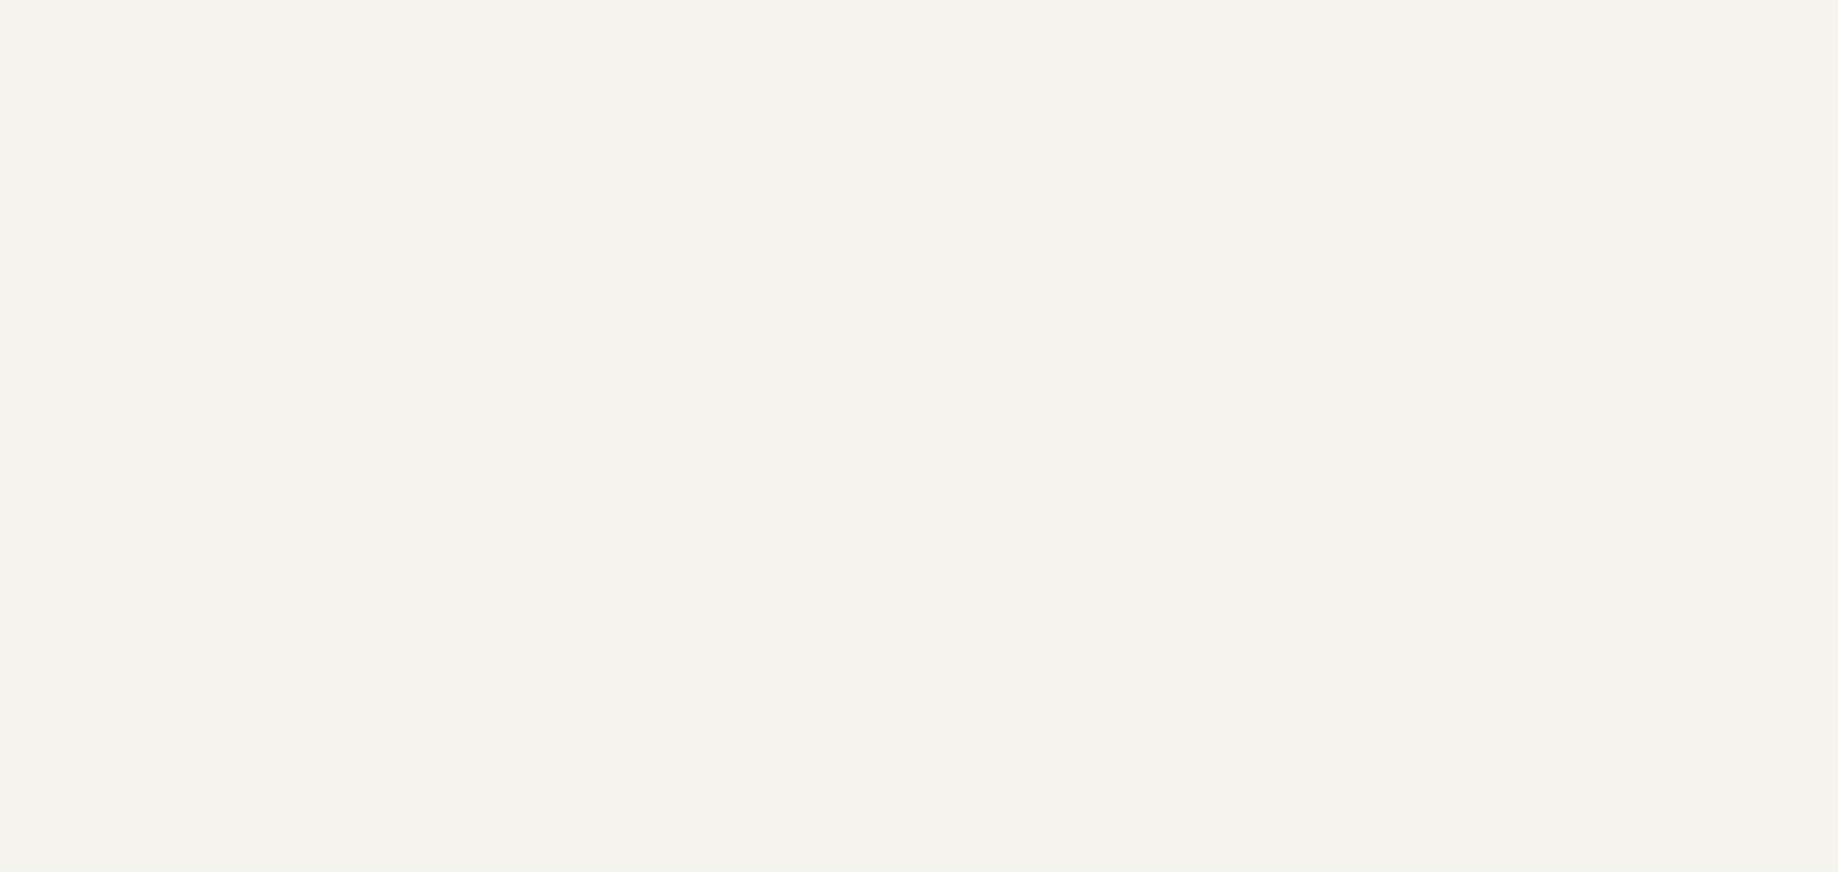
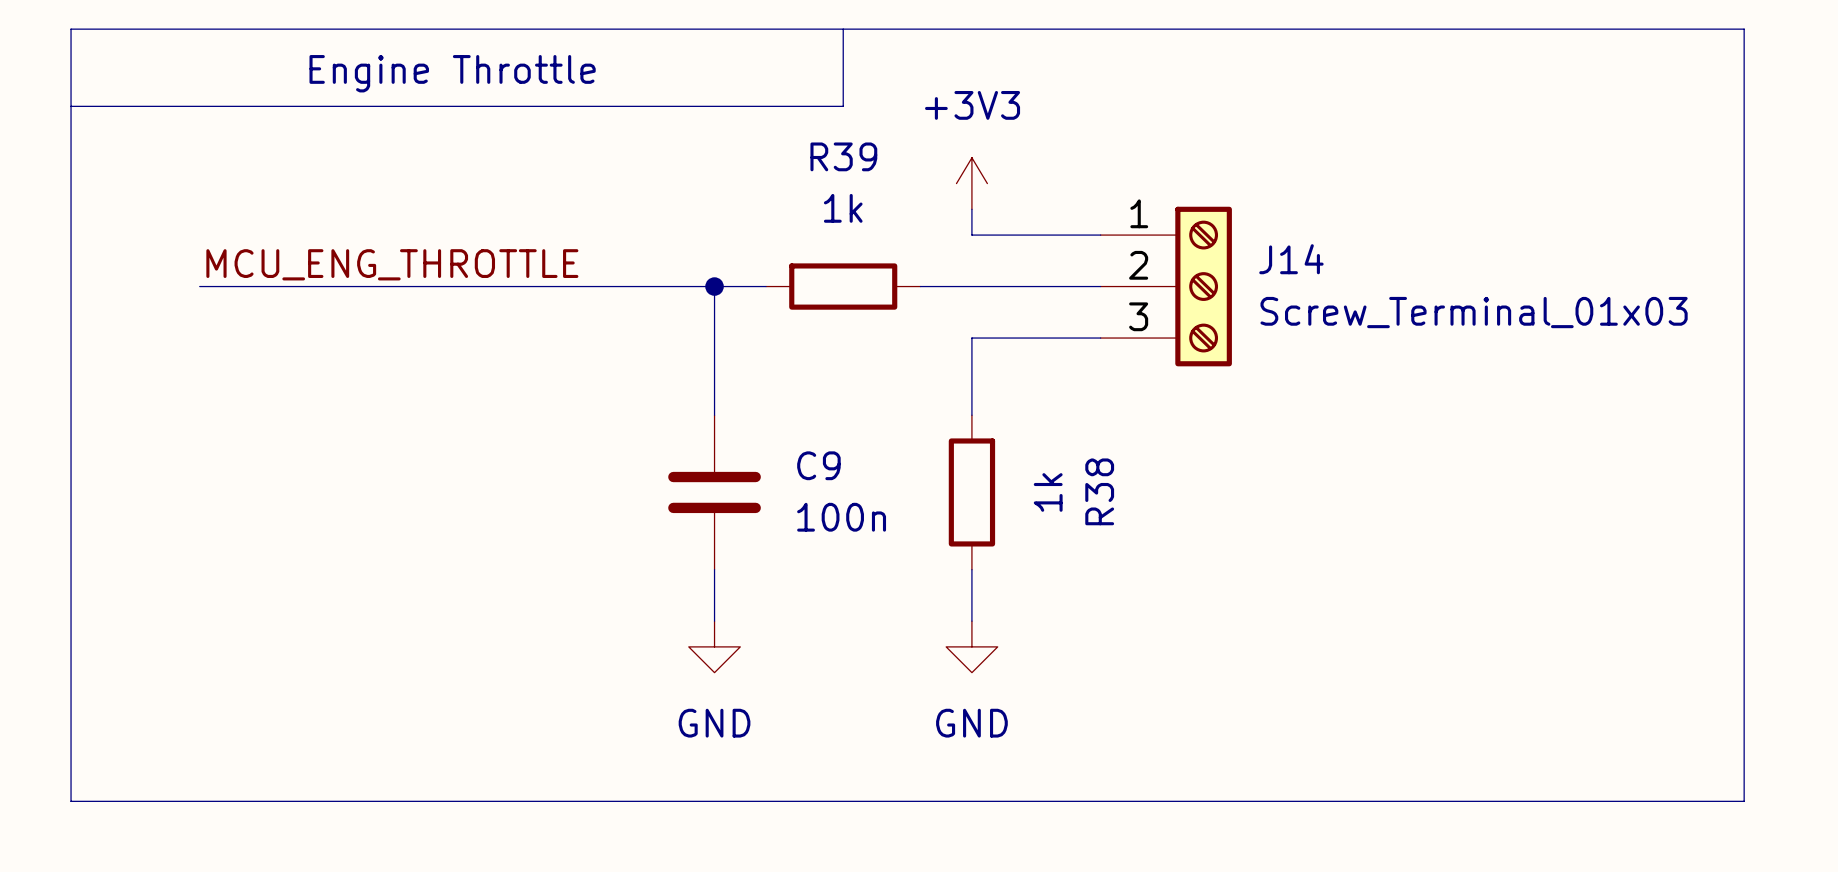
line: none -> (71, 29) (1744, 29) (1744, 801) (71, 801) (71, 29)
line: none -> (843, 29) (843, 106) (71, 106)
text: none -> Engine Throttle (452, 73)
power symbol: none -> +3V3 (971, 183)
wire: none -> (971, 209) (971, 235) (1100, 235)
label: none -> MCU_ENG_THROTTLE (392, 264)
wire: none -> (199, 286) (766, 286)
wire: none -> (714, 286) (714, 415)
junction: none -> (714, 286)
R39: none -> 1k (843, 286)
wire: none -> (920, 286) (1100, 286)
J14: none -> Screw_Terminal_01x03 (1166, 286)
wire: none -> (1100, 338) (971, 338) (971, 415)
C9: none -> 100n (714, 492)
R38: none -> 1k (971, 492)
wire: none -> (714, 569) (714, 621)
wire: none -> (971, 569) (971, 621)
power symbol: none -> GND (714, 646)
power symbol: none -> GND (971, 646)

